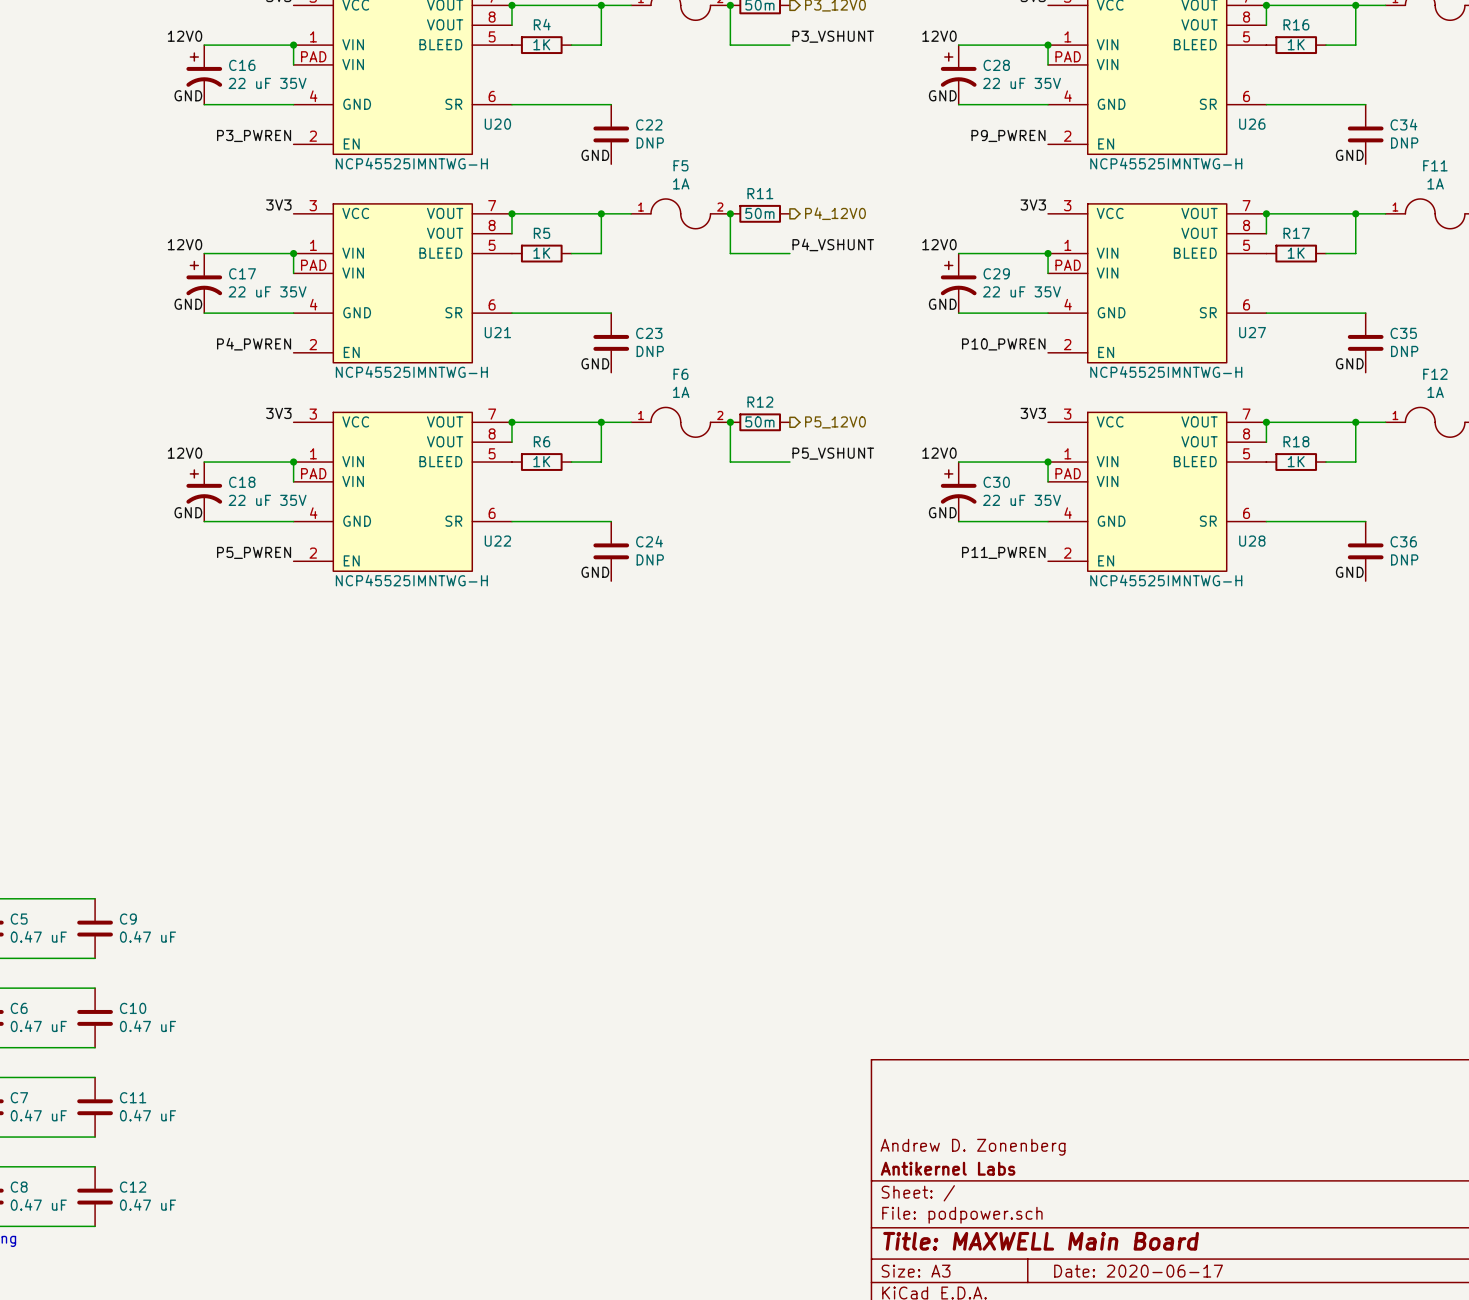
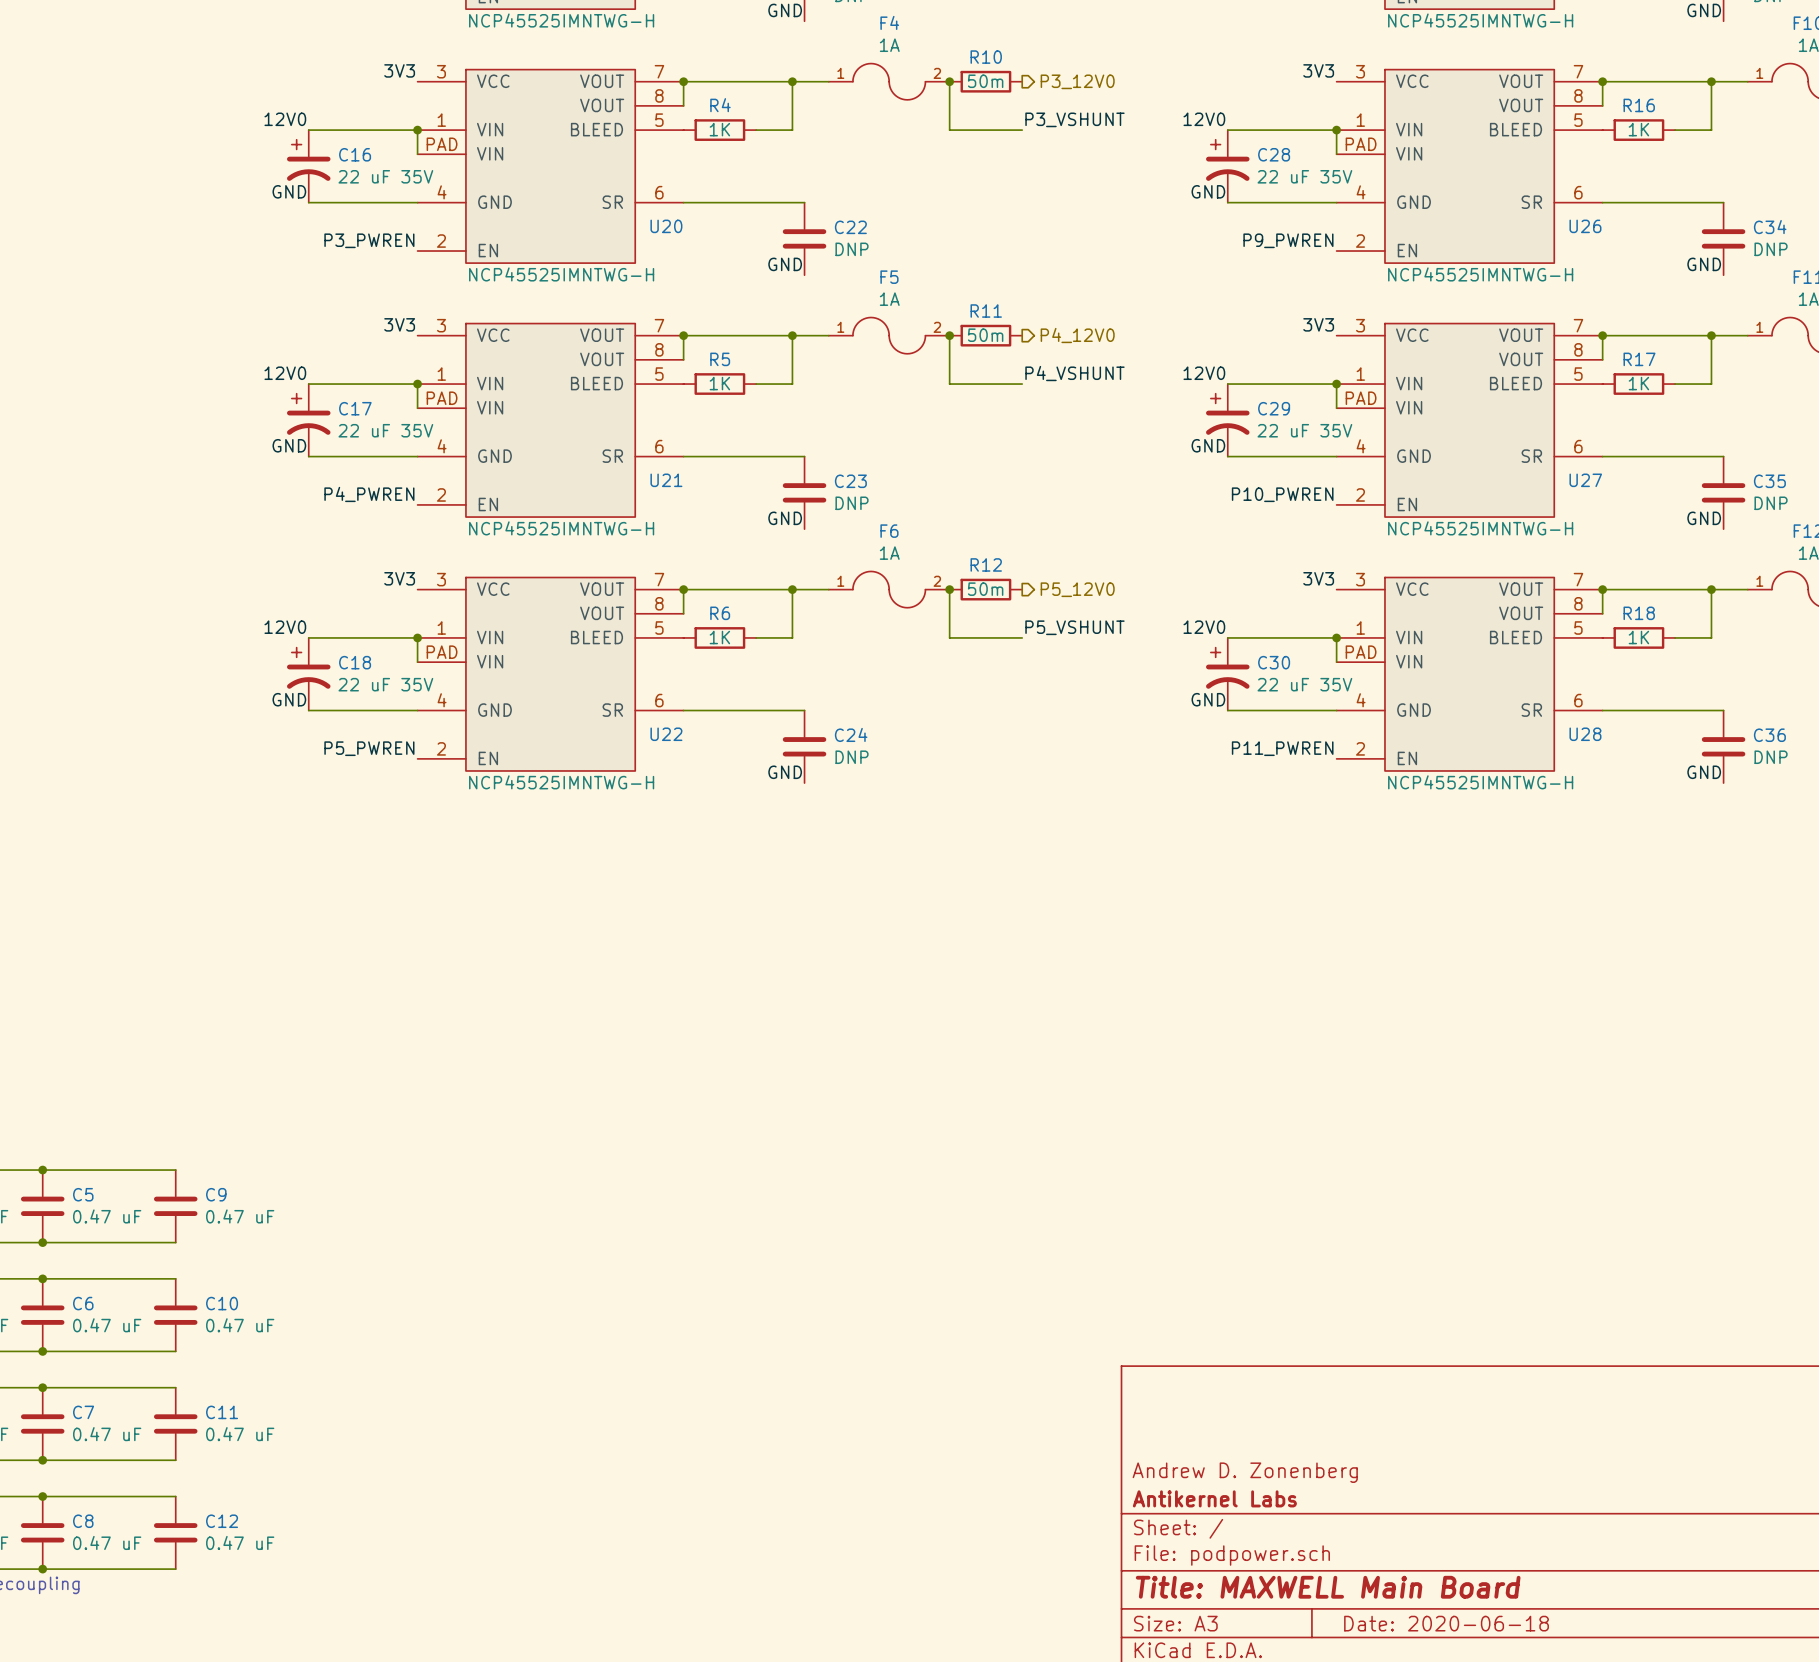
title block: Date: 2020-06-17 (1138, 1271) -> Date: 2020-06-18 (1446, 1623)

